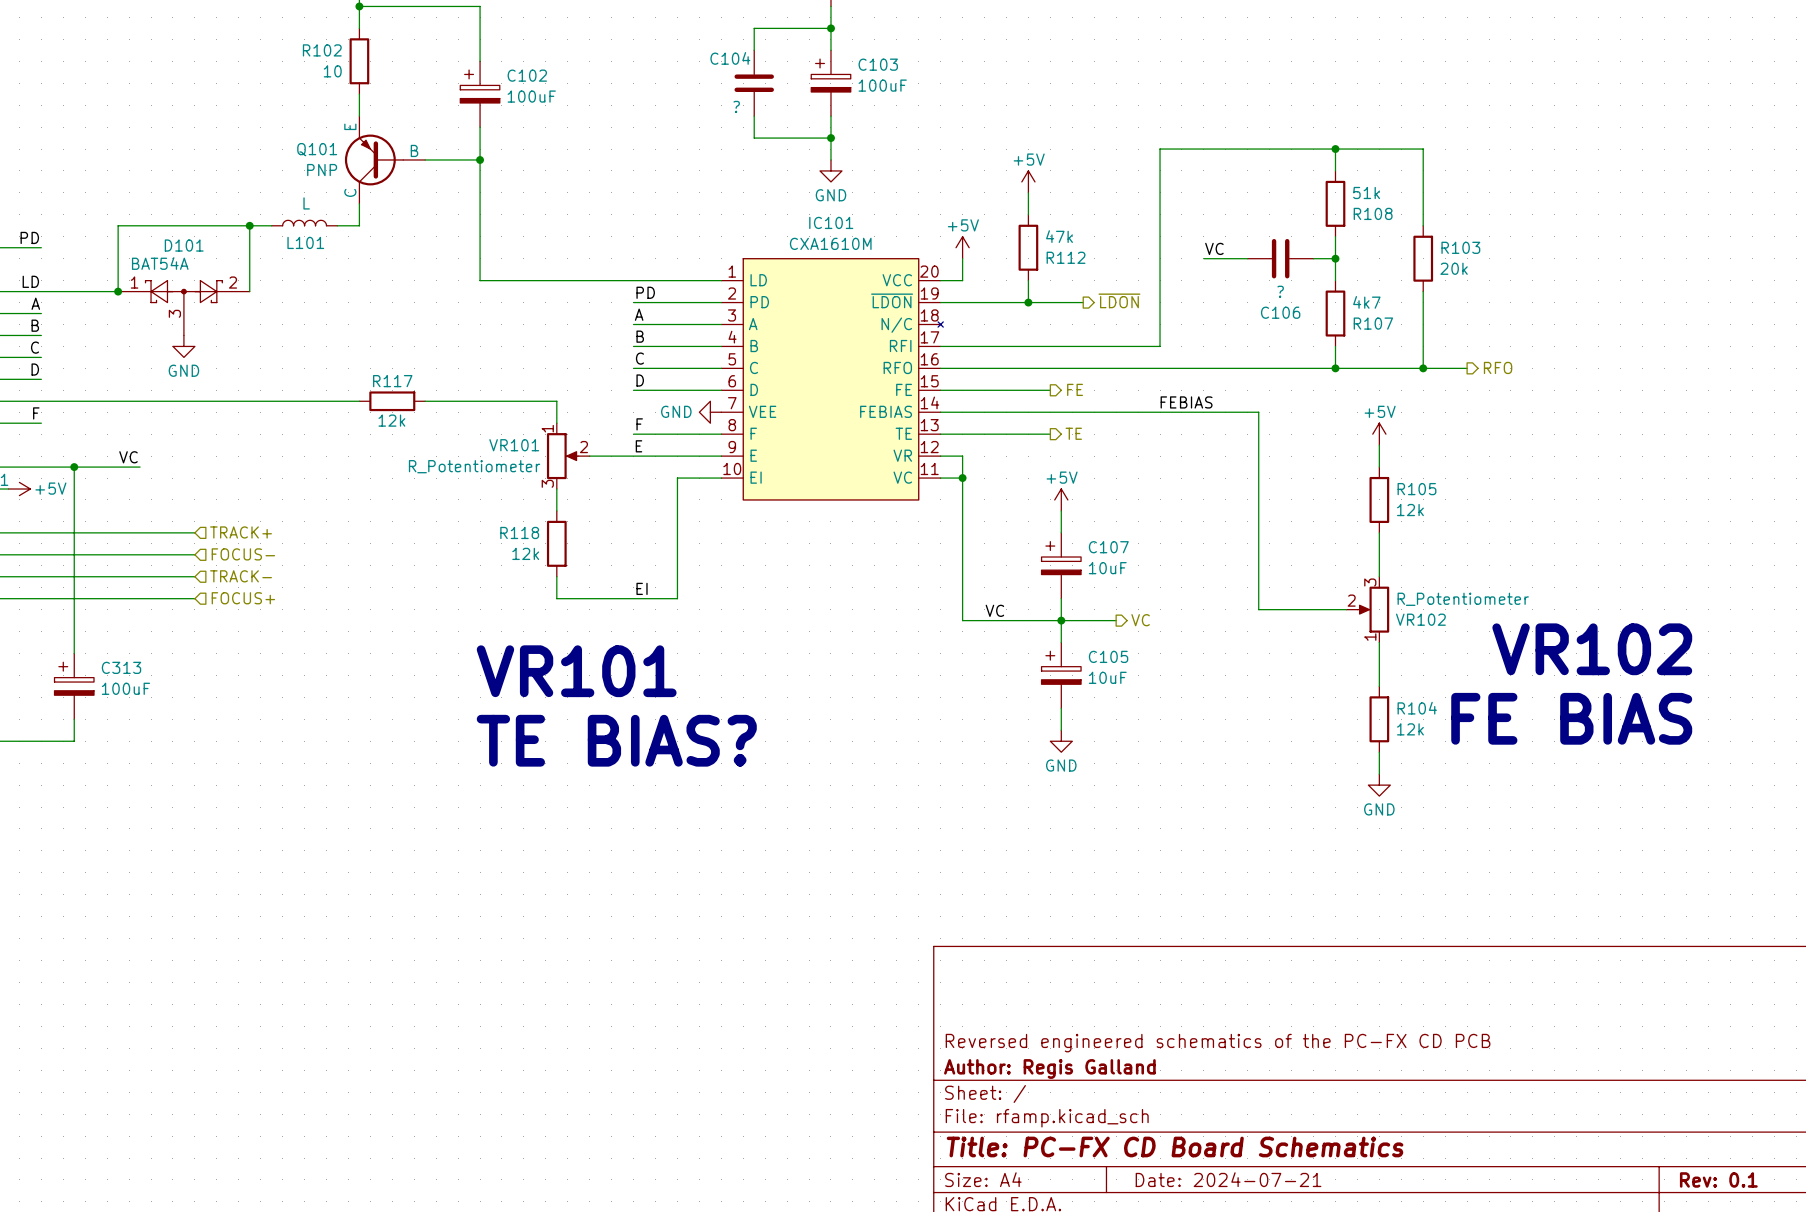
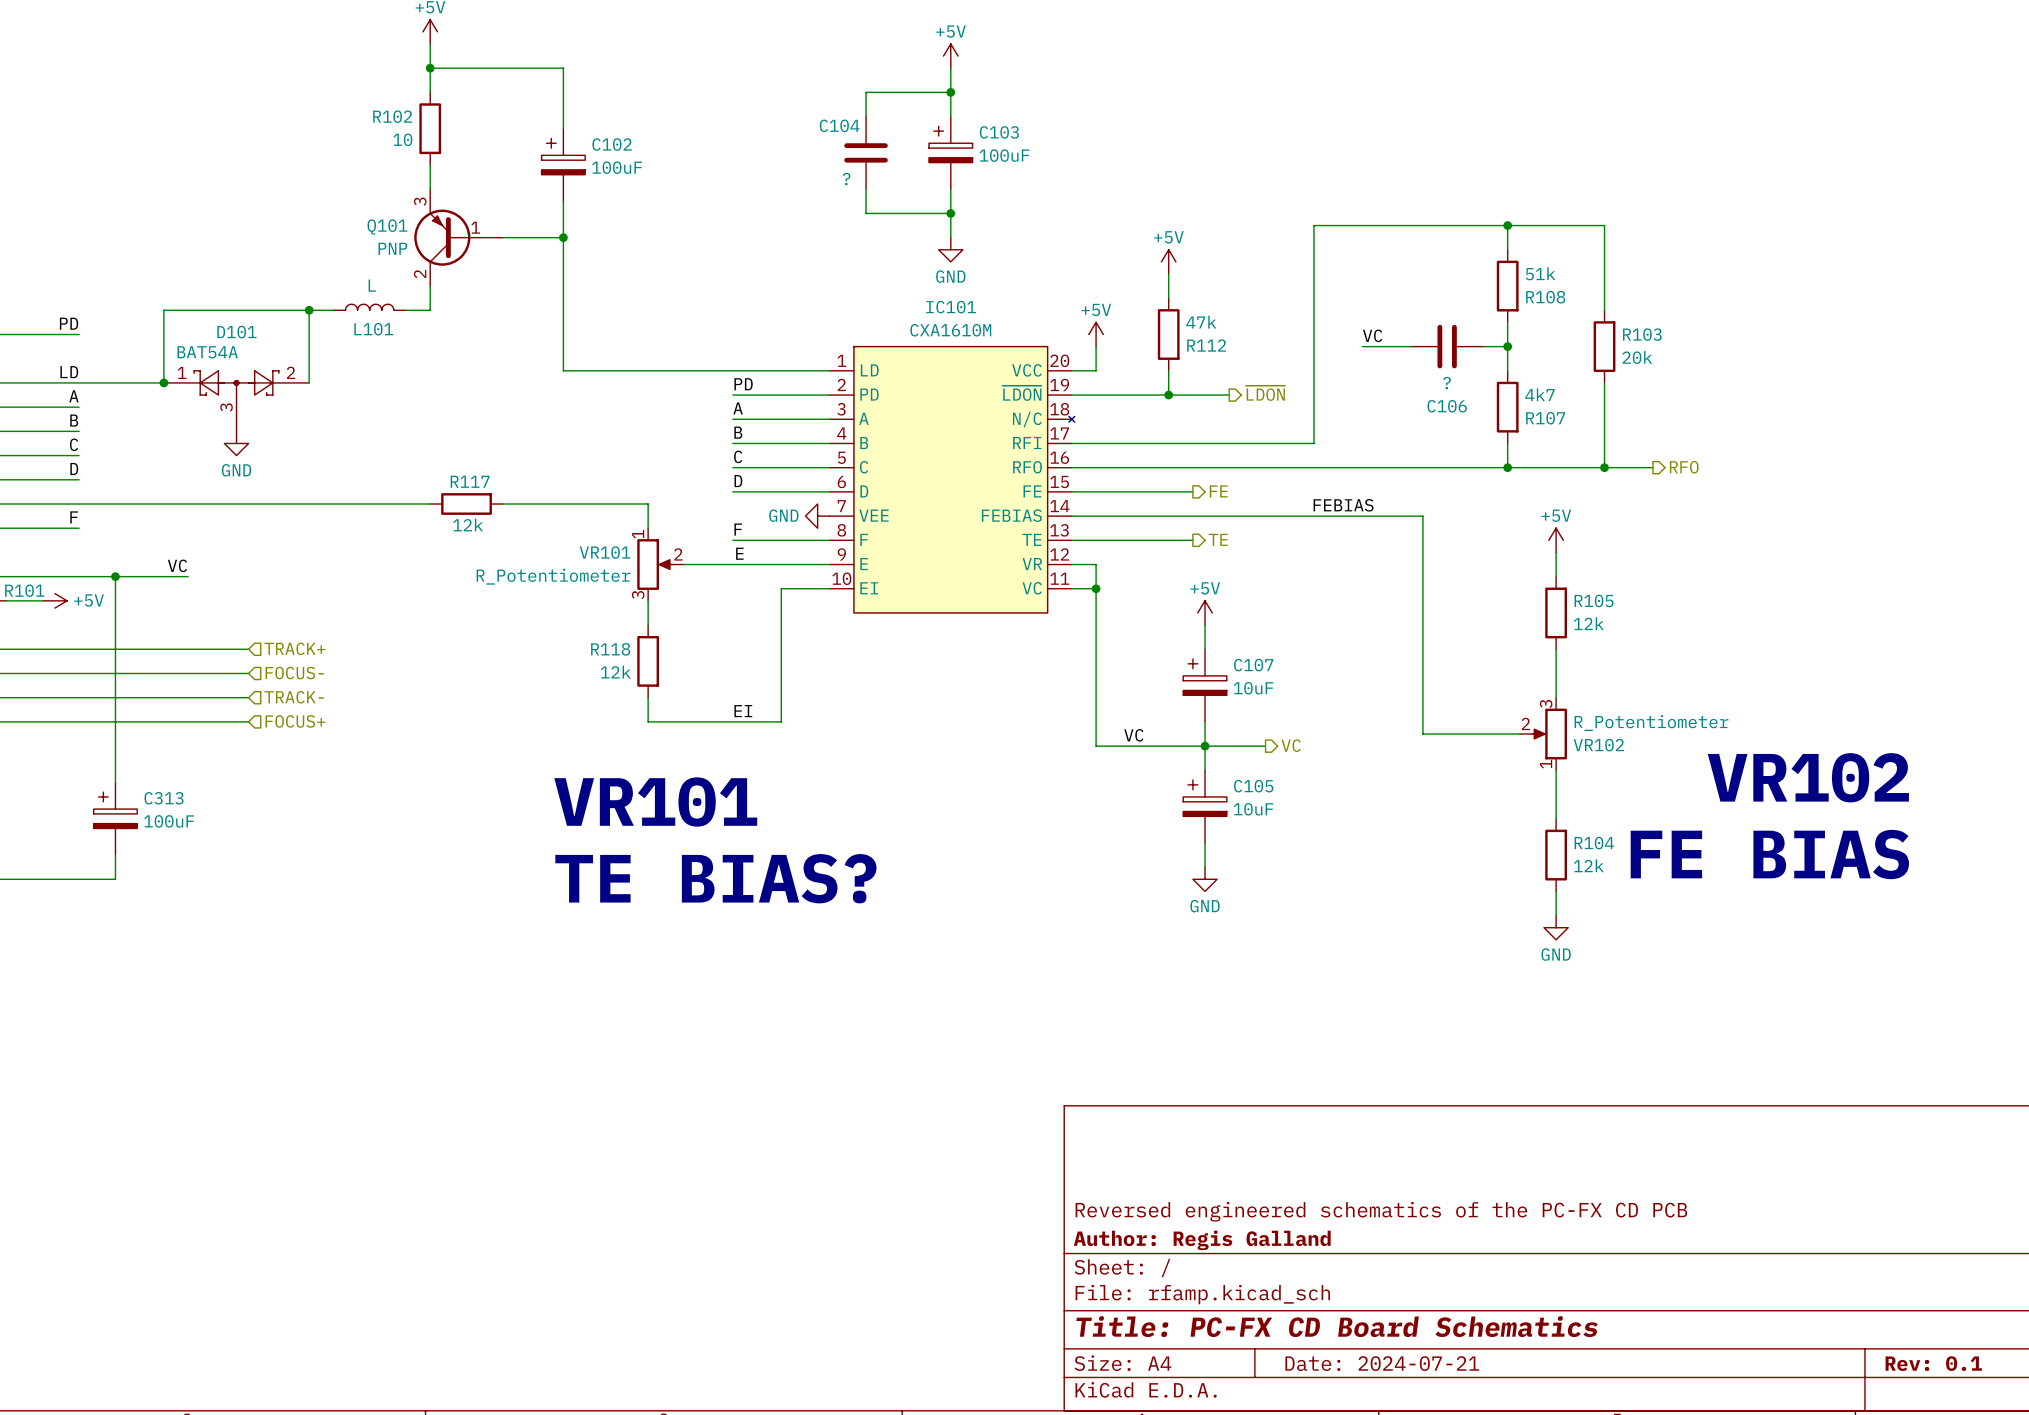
Q101 symbol: [344, 116, 426, 204] -> [414, 189, 503, 287]

